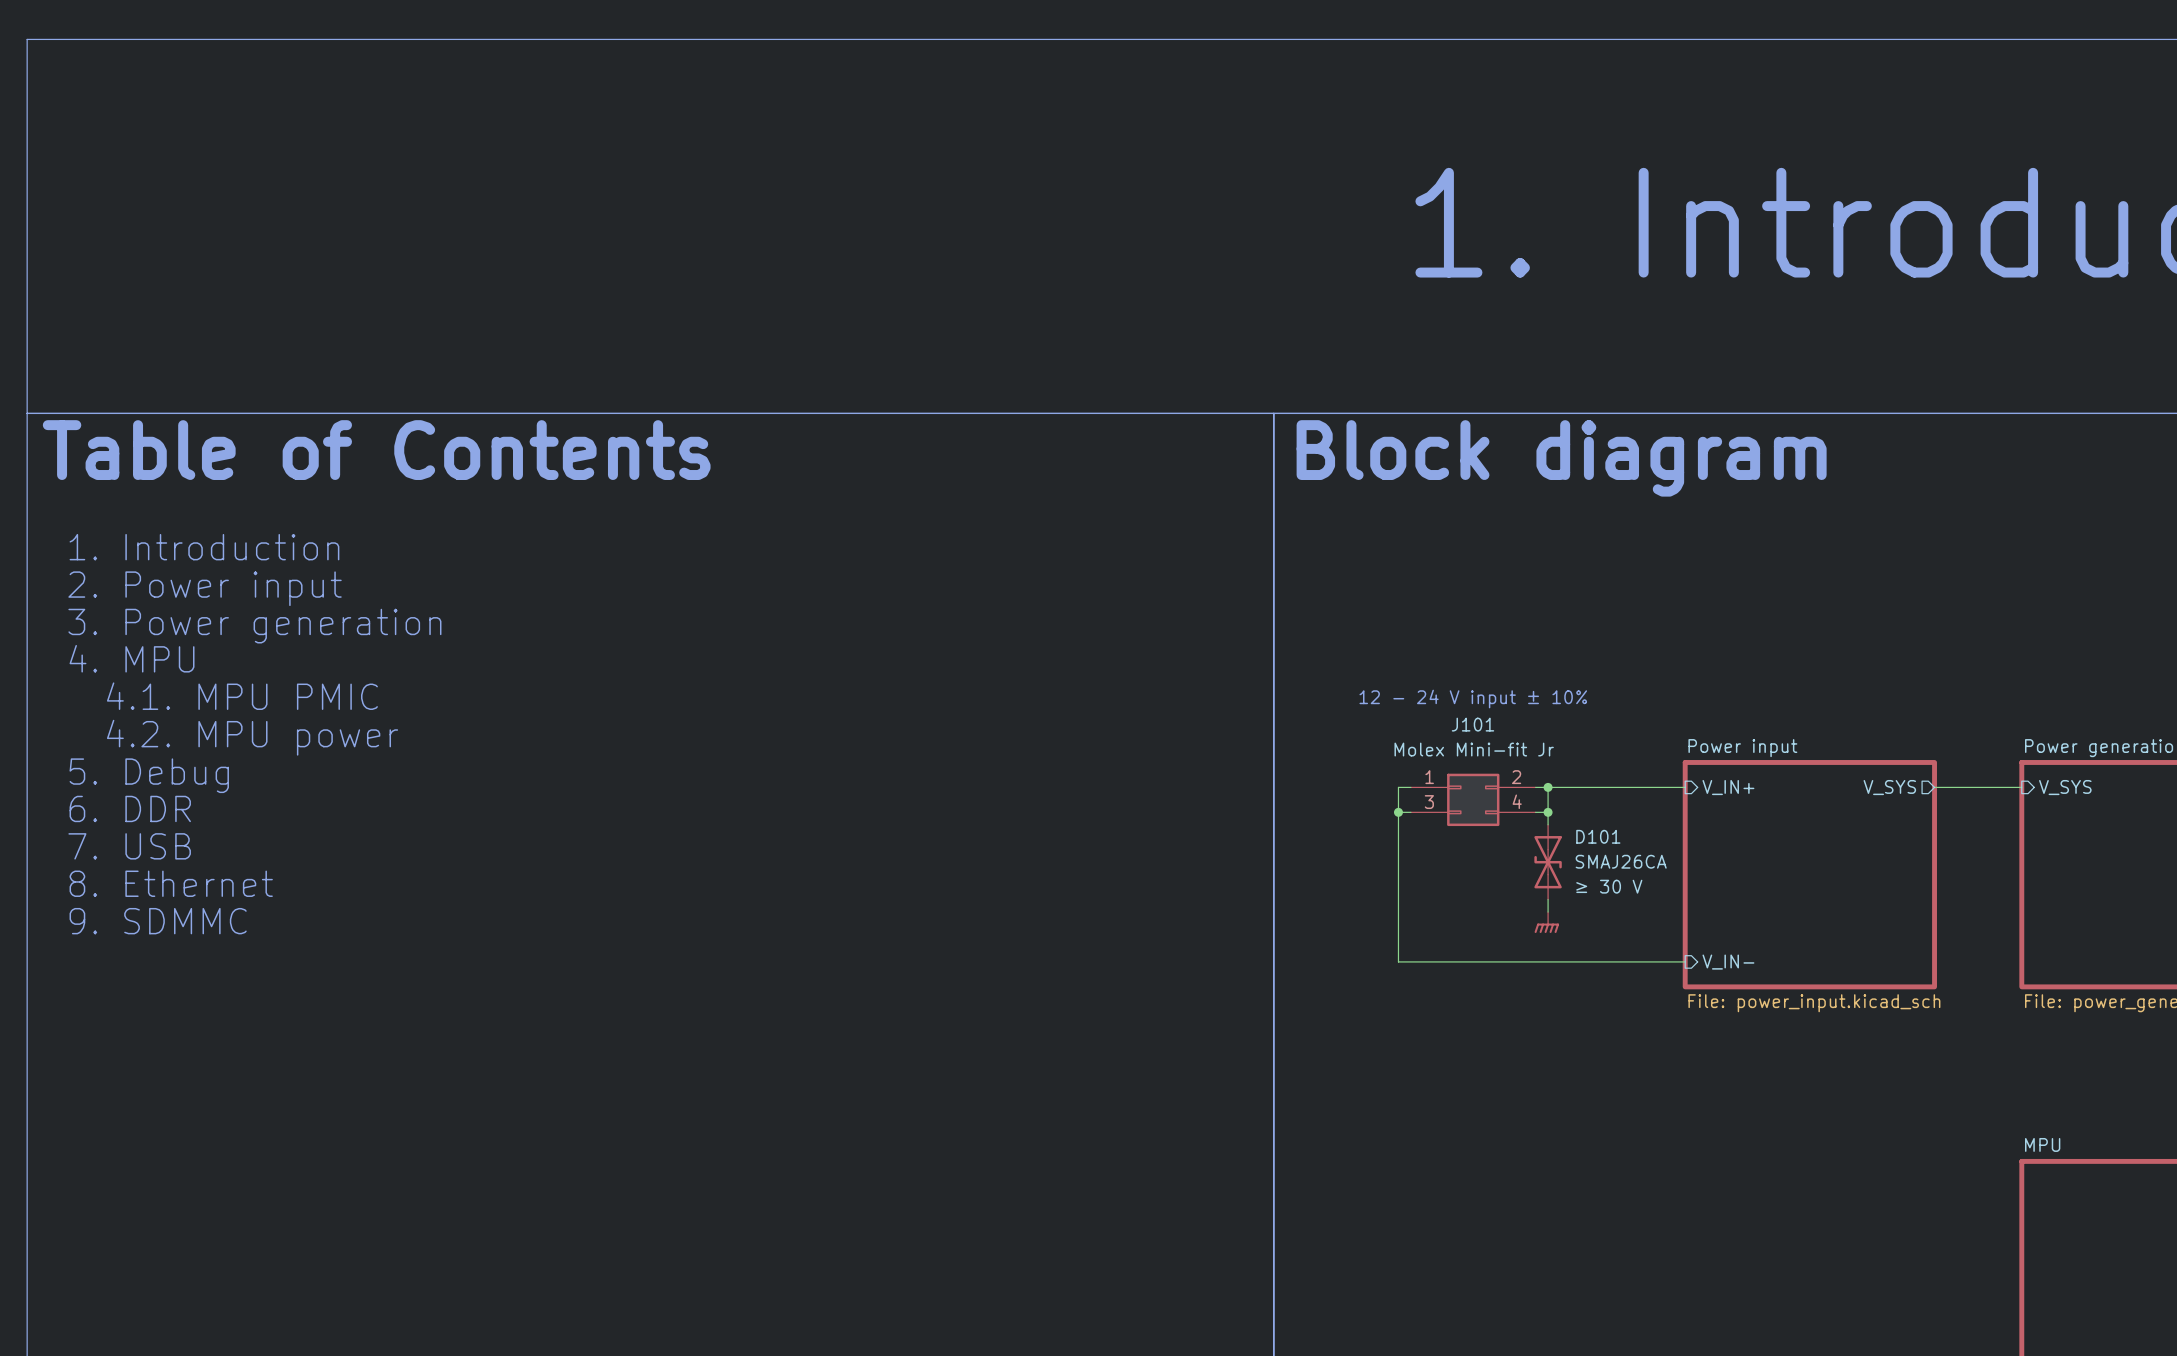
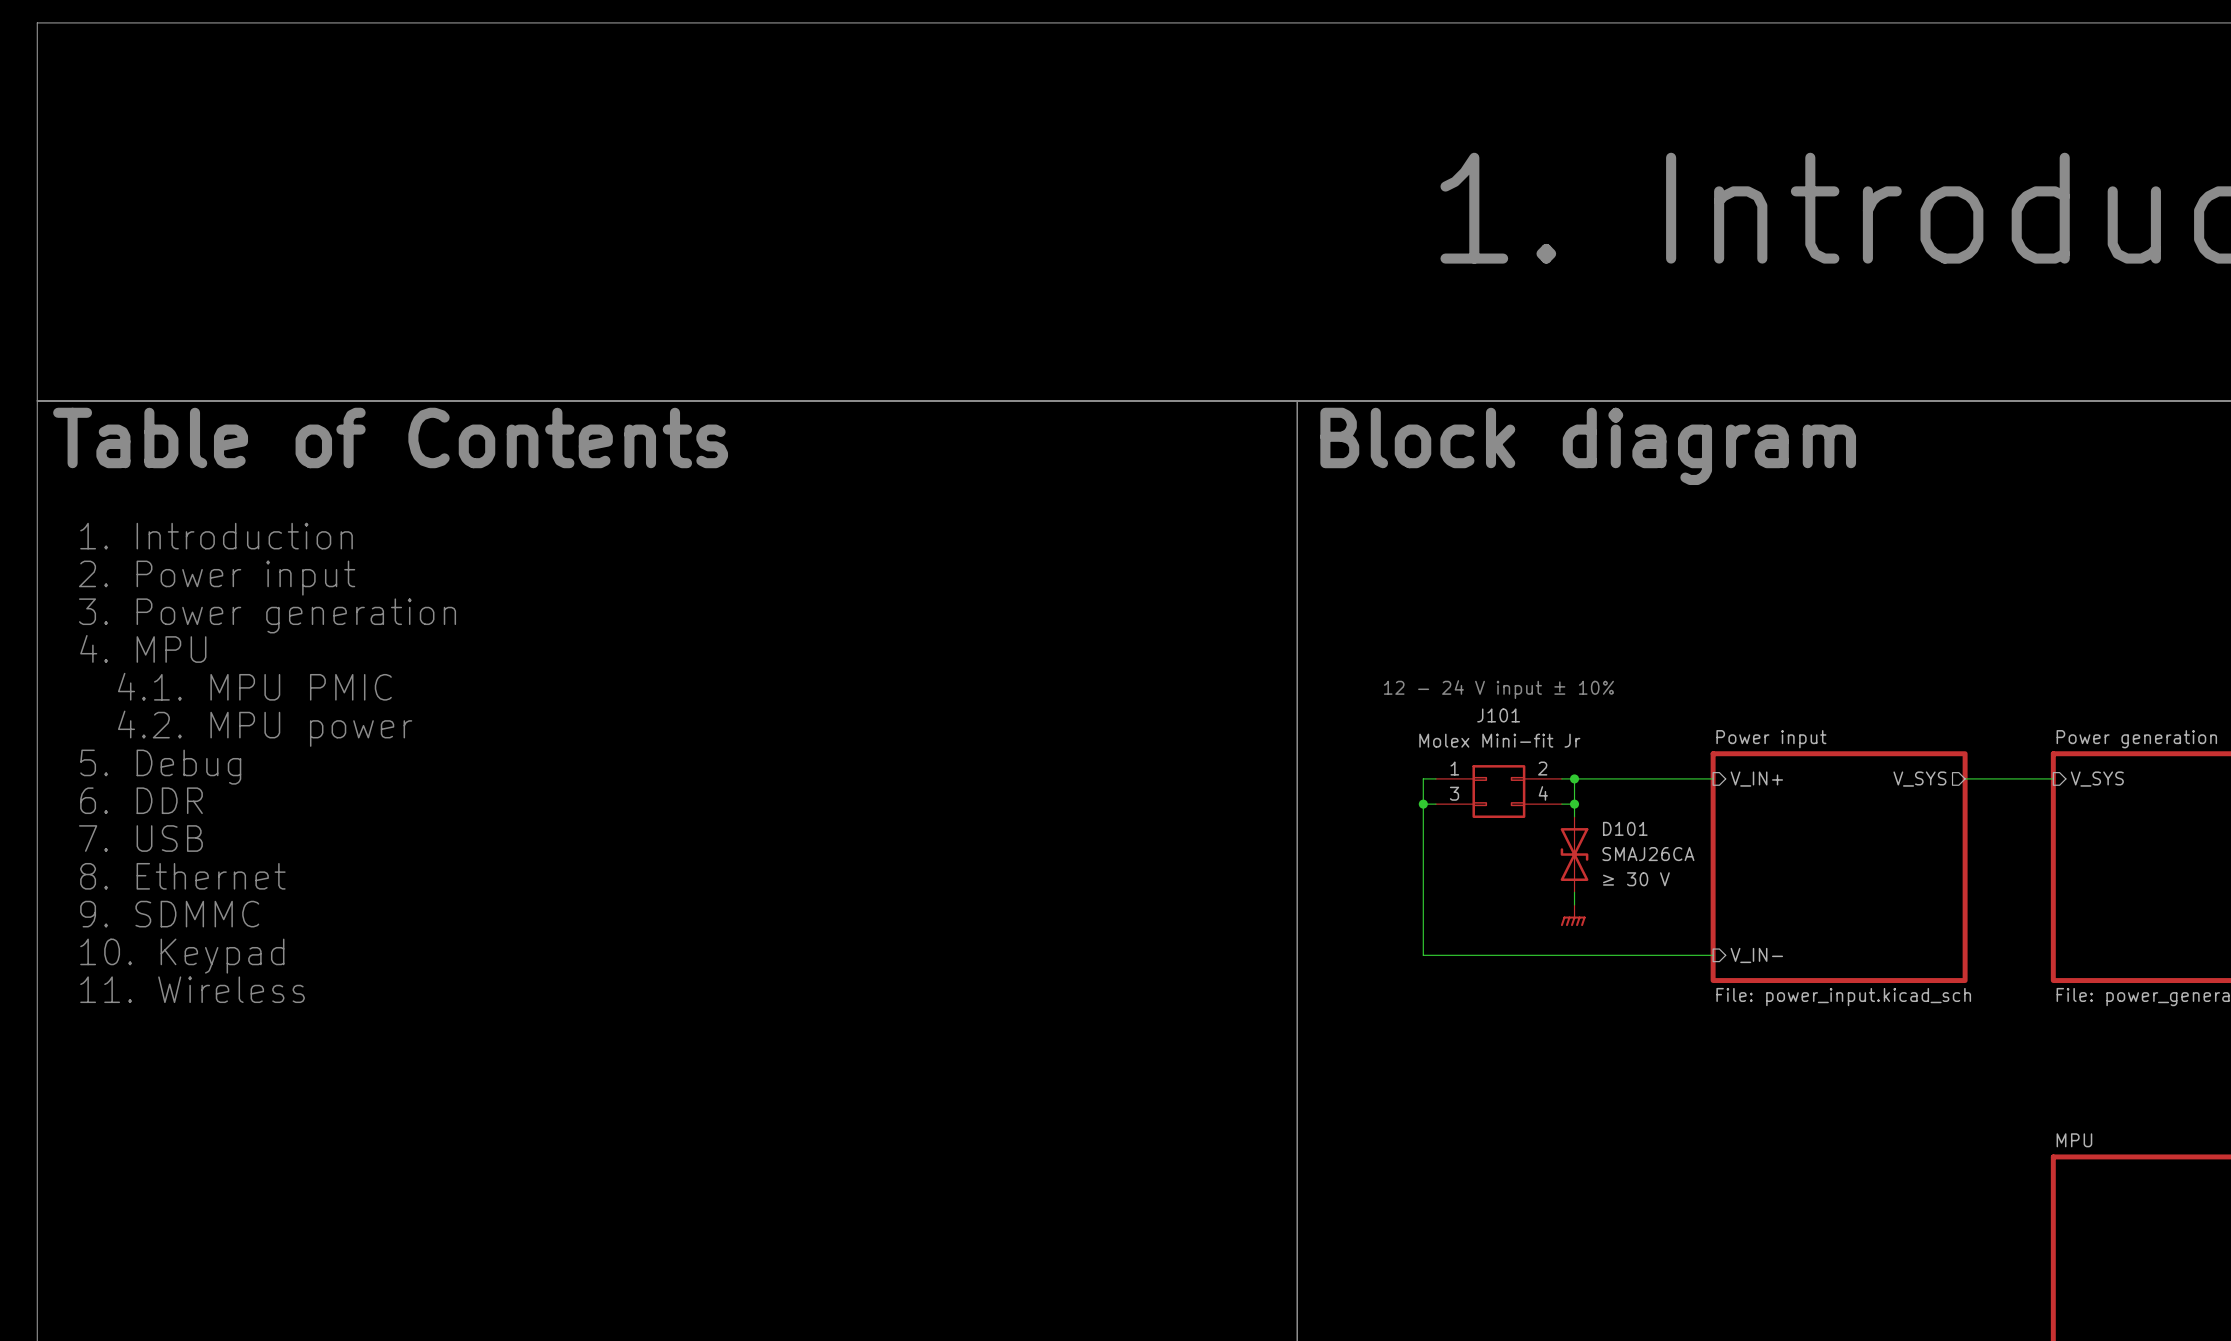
text: none -> 10. Keypad (182, 956)
text: none -> 11. Wireless (192, 989)

